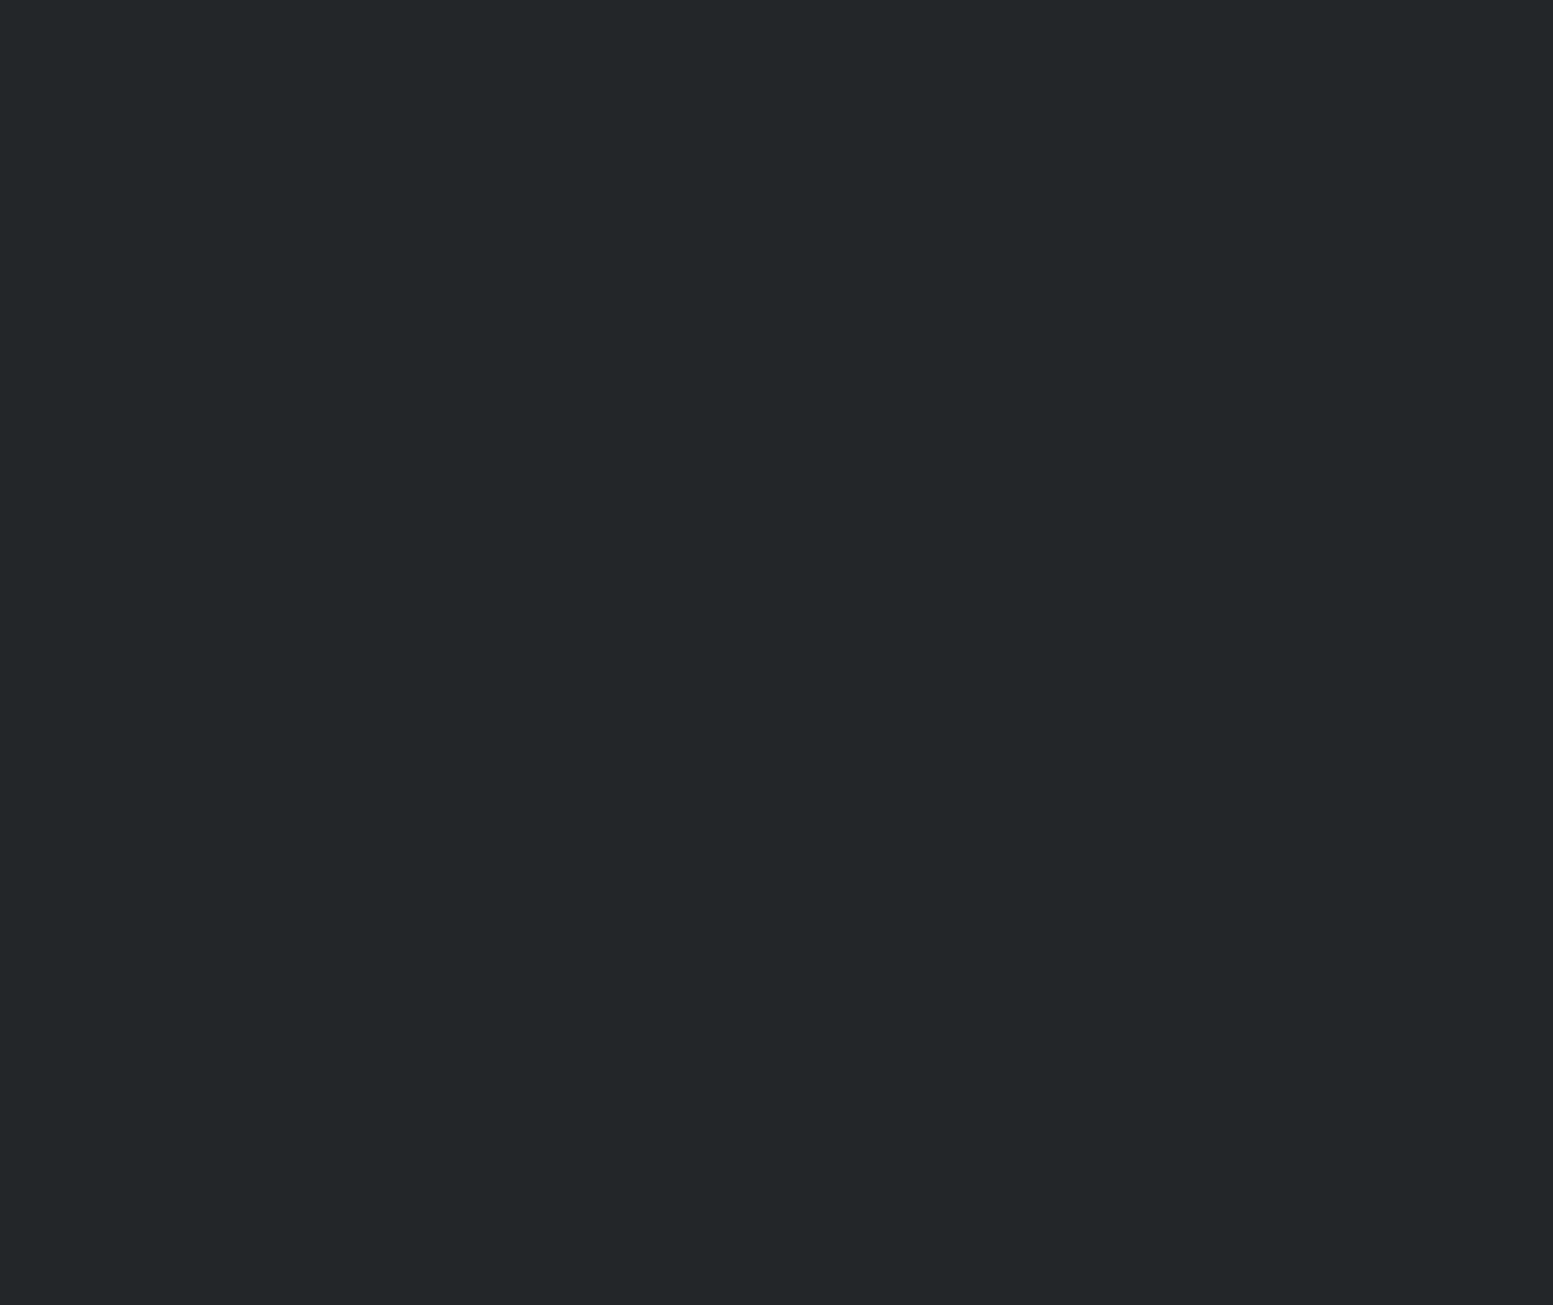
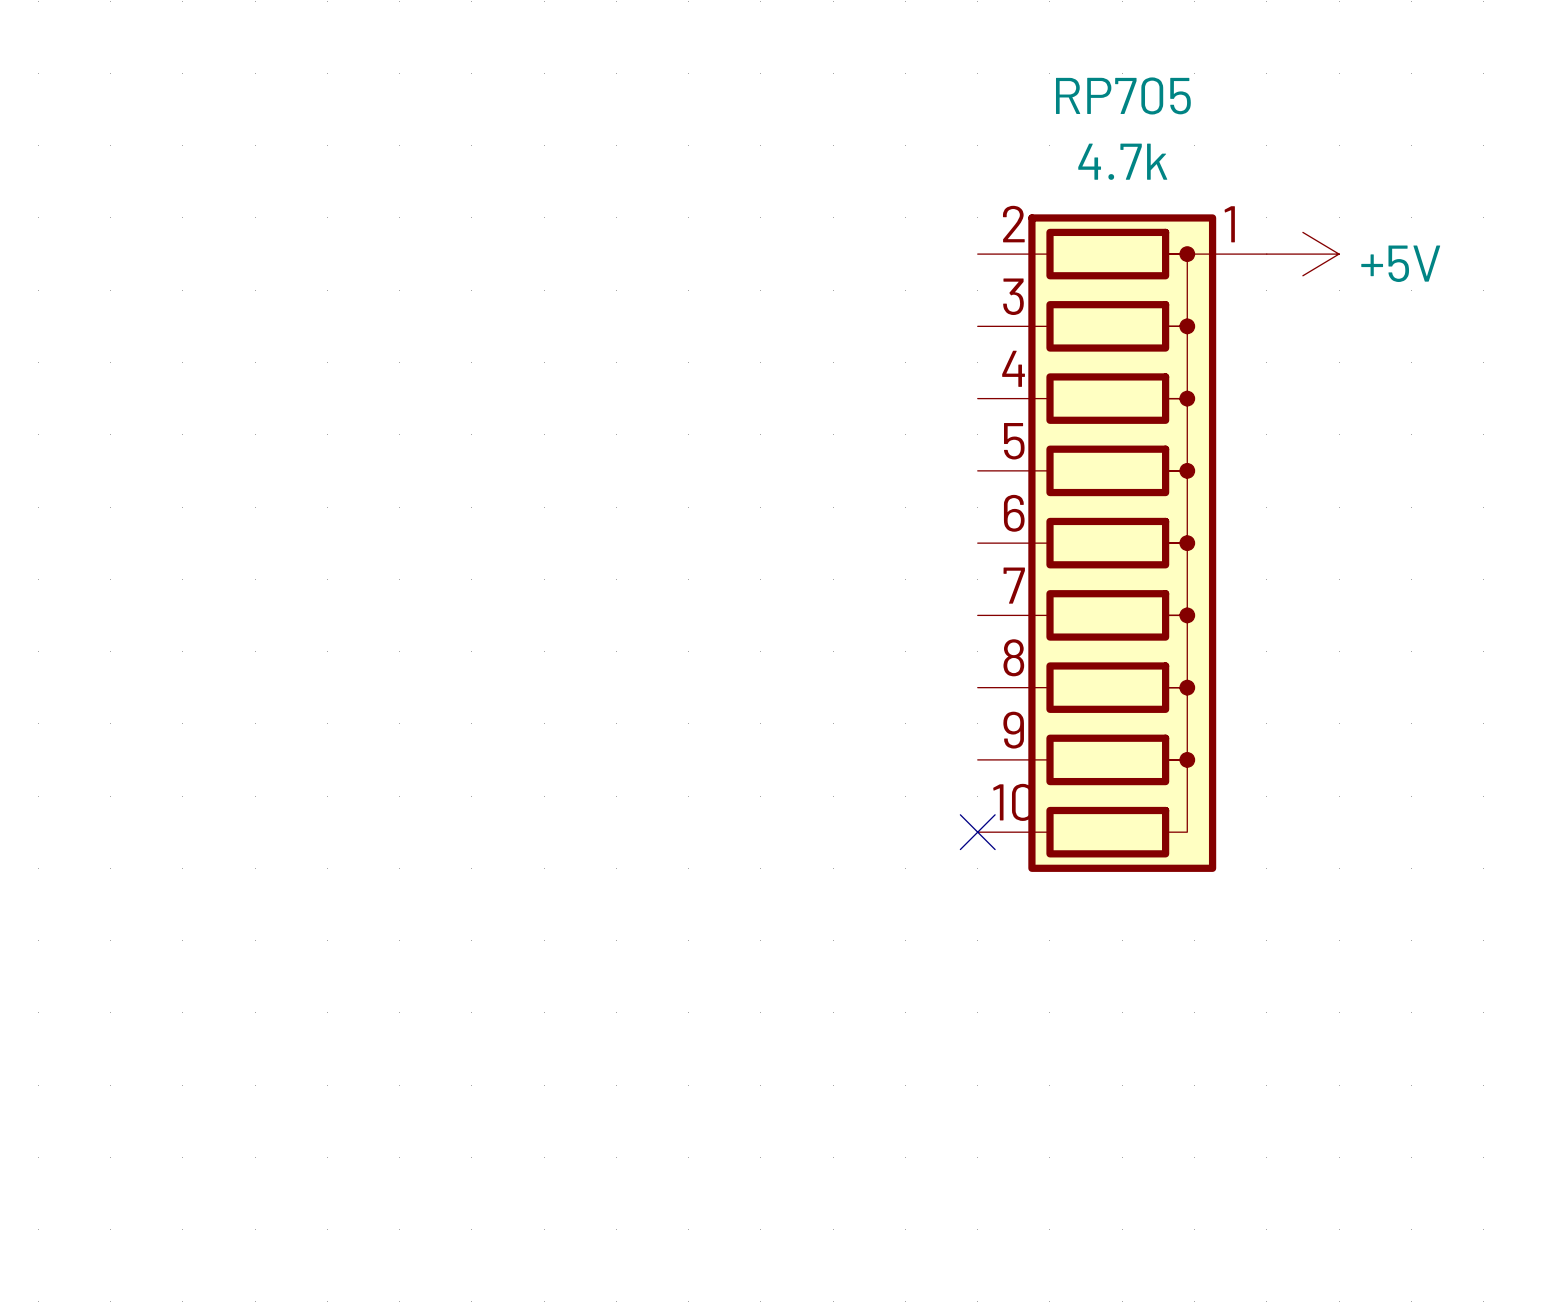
power symbol: none -> +5V (1302, 254)
RP705: none -> 4.7k (1122, 543)
no-connect mark: none -> (977, 832)

